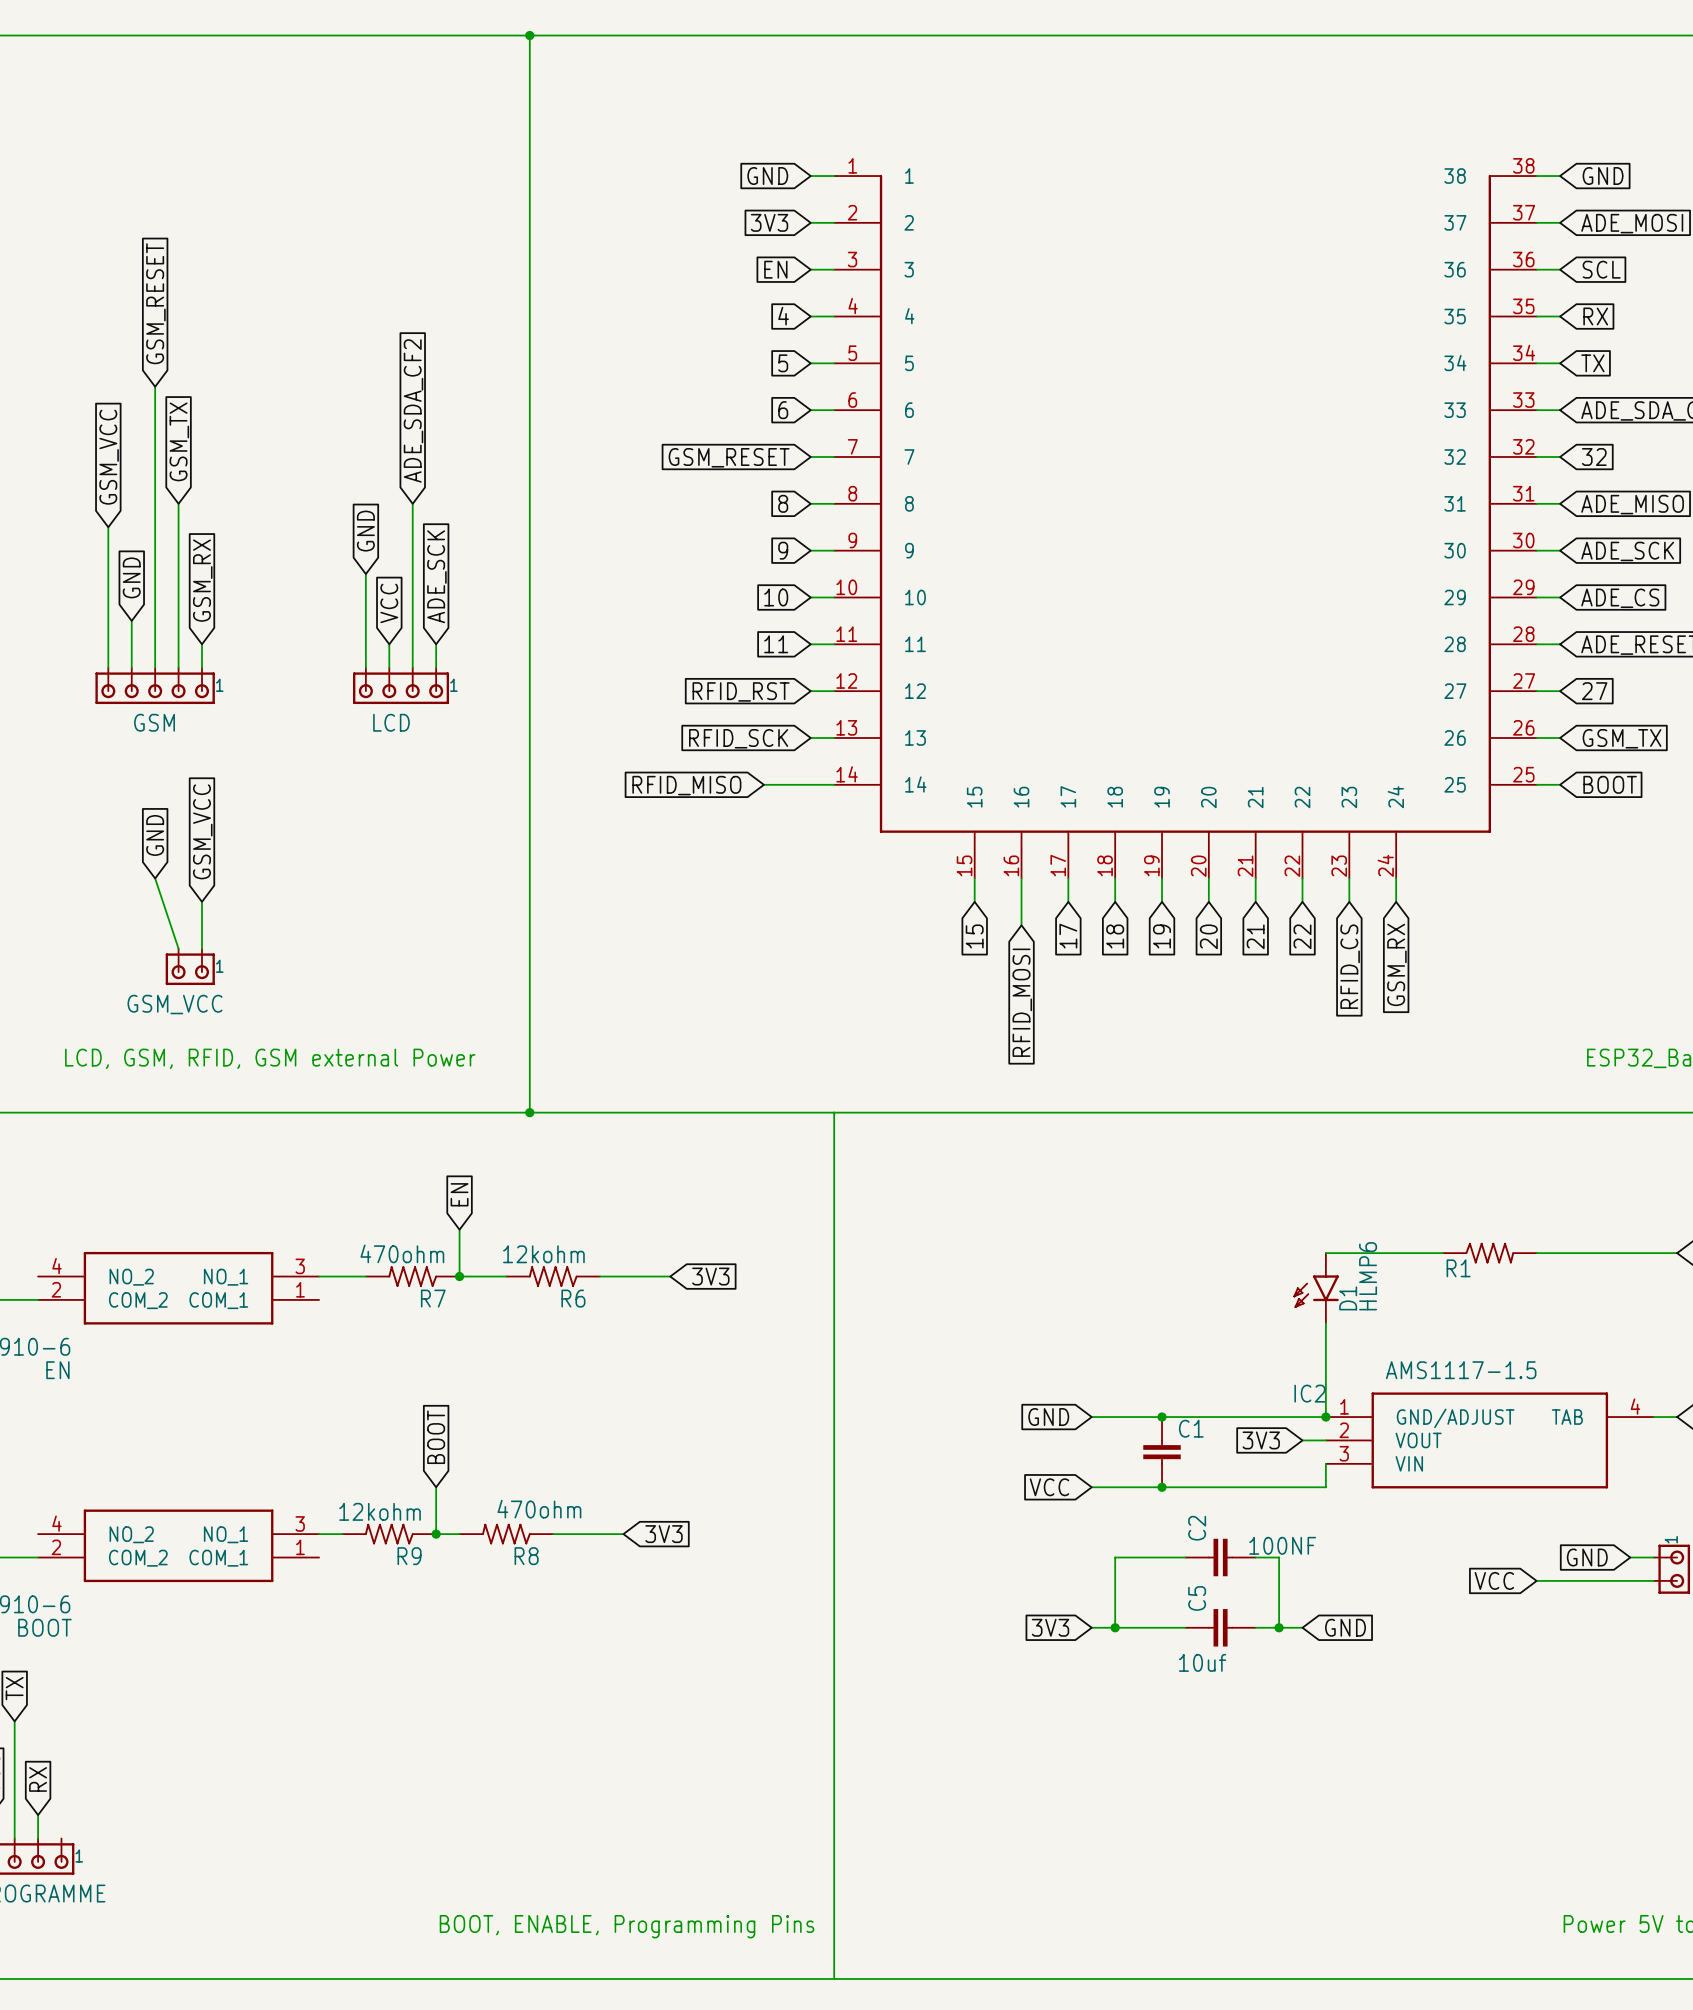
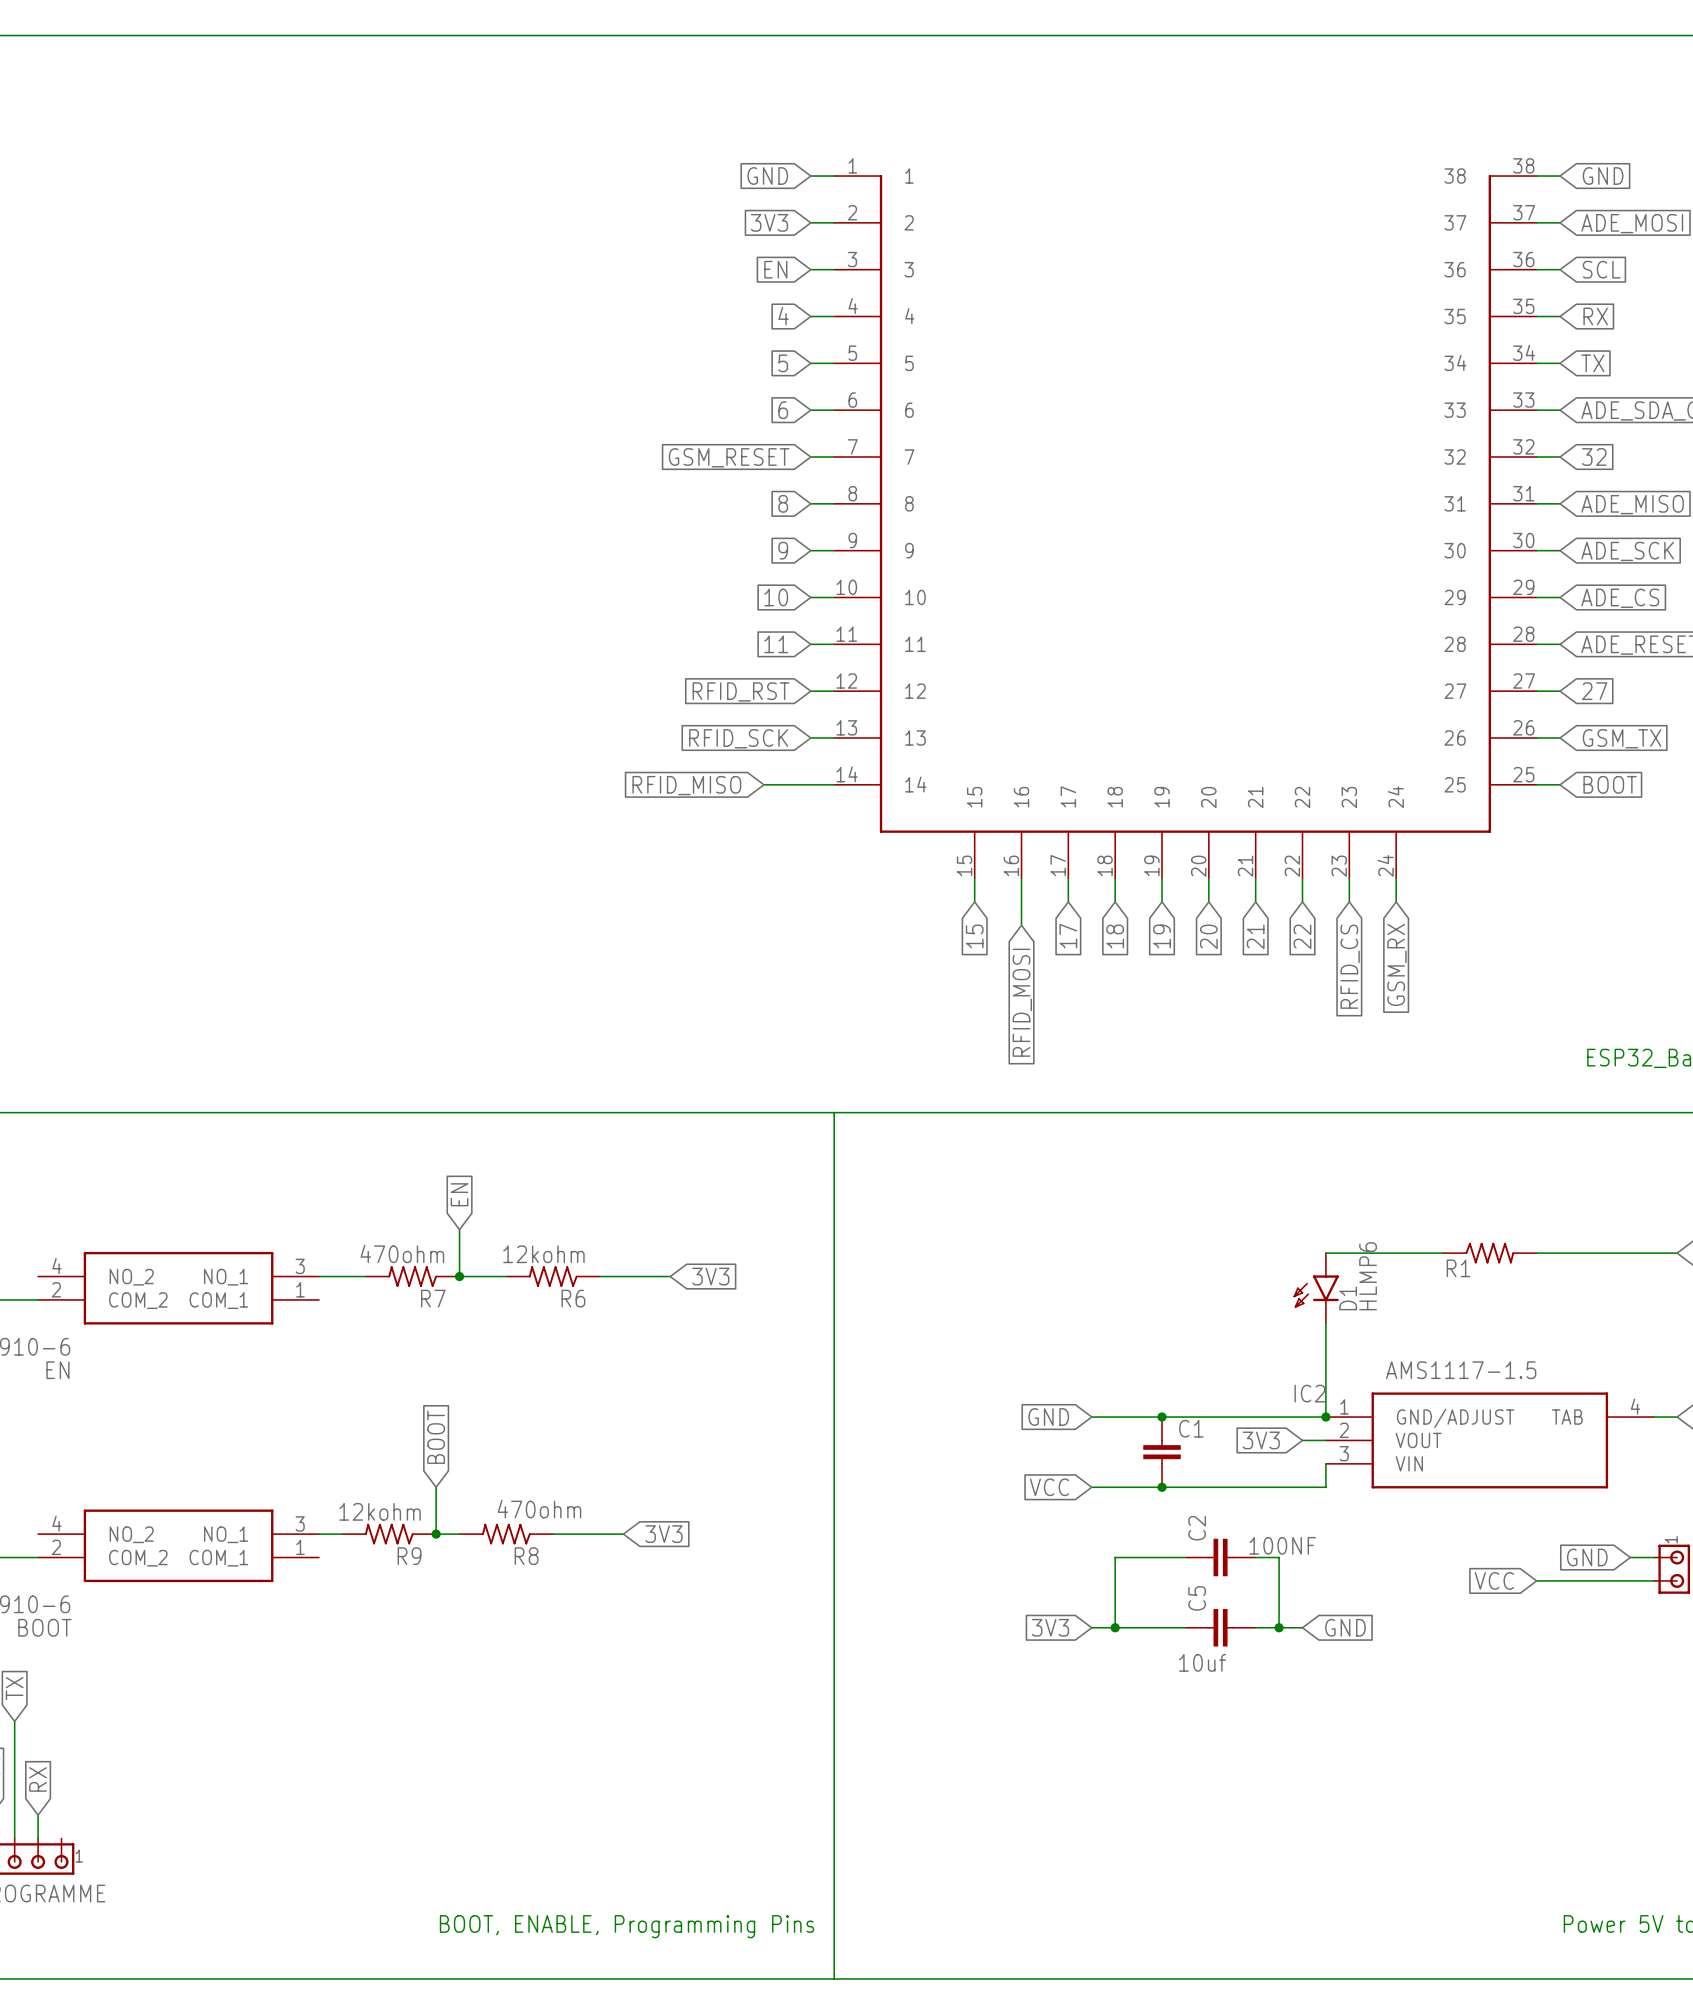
wire: (529, 35) (529, 1112) -> none
junction: (529, 35) -> none
global label: GSM_RESET (155, 303) -> none
wire: (155, 386) (155, 667) -> none
global label: ADE_SDA_CF2 (413, 410) -> none
global label: GSM_TX (179, 441) -> none
global label: GSM_VCC (109, 457) -> none
wire: (178, 503) (178, 667) -> none
wire: (412, 503) (412, 667) -> none
wire: (108, 527) (108, 667) -> none
global label: GND (365, 531) -> none
wire: (365, 574) (365, 667) -> none
global label: ADE_SCK (436, 576) -> none
global label: GND (131, 577) -> none
global label: GSM_RX (202, 580) -> none
global label: VCC (389, 603) -> none
wire: (131, 620) (131, 667) -> none
wire: (201, 644) (201, 667) -> none
wire: (389, 644) (389, 667) -> none
wire: (436, 644) (436, 667) -> none
GSM: (155, 685) -> none
LCD: (401, 685) -> none
global label: GSM_VCC (202, 831) -> none
global label: GND (155, 835) -> none
wire: (155, 878) (178, 948) -> none
wire: (201, 901) (201, 948) -> none
GSM_VCC: (190, 966) -> none
text: LCD, GSM, RFID, GSM external Power (270, 1058) -> none
junction: (529, 1112) -> none

